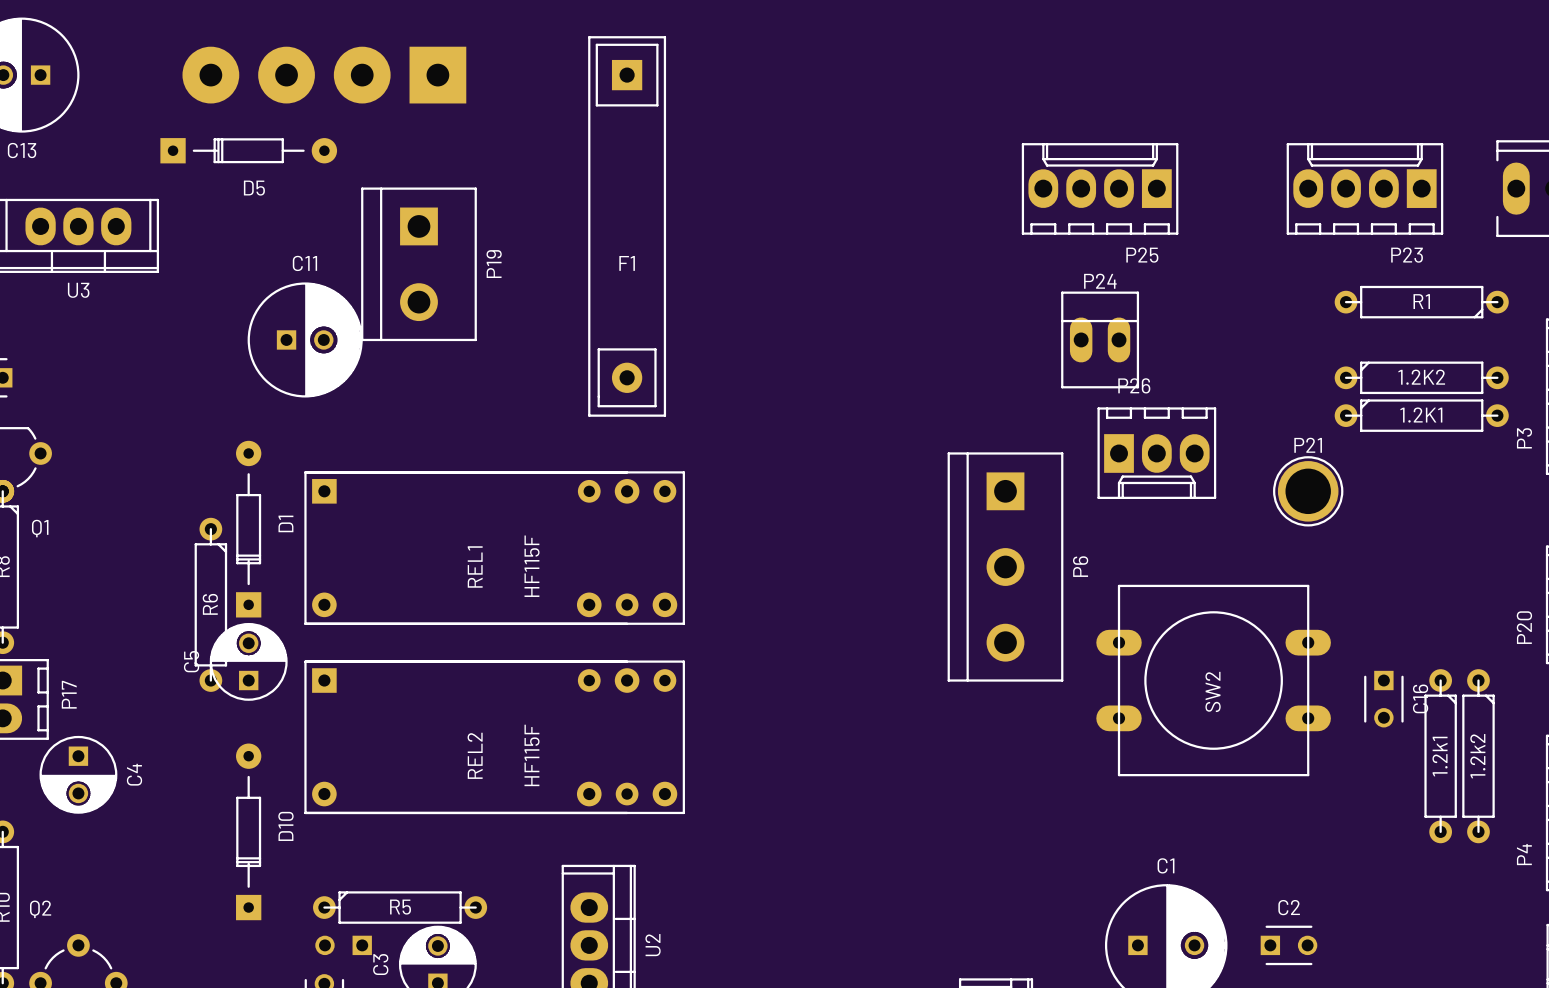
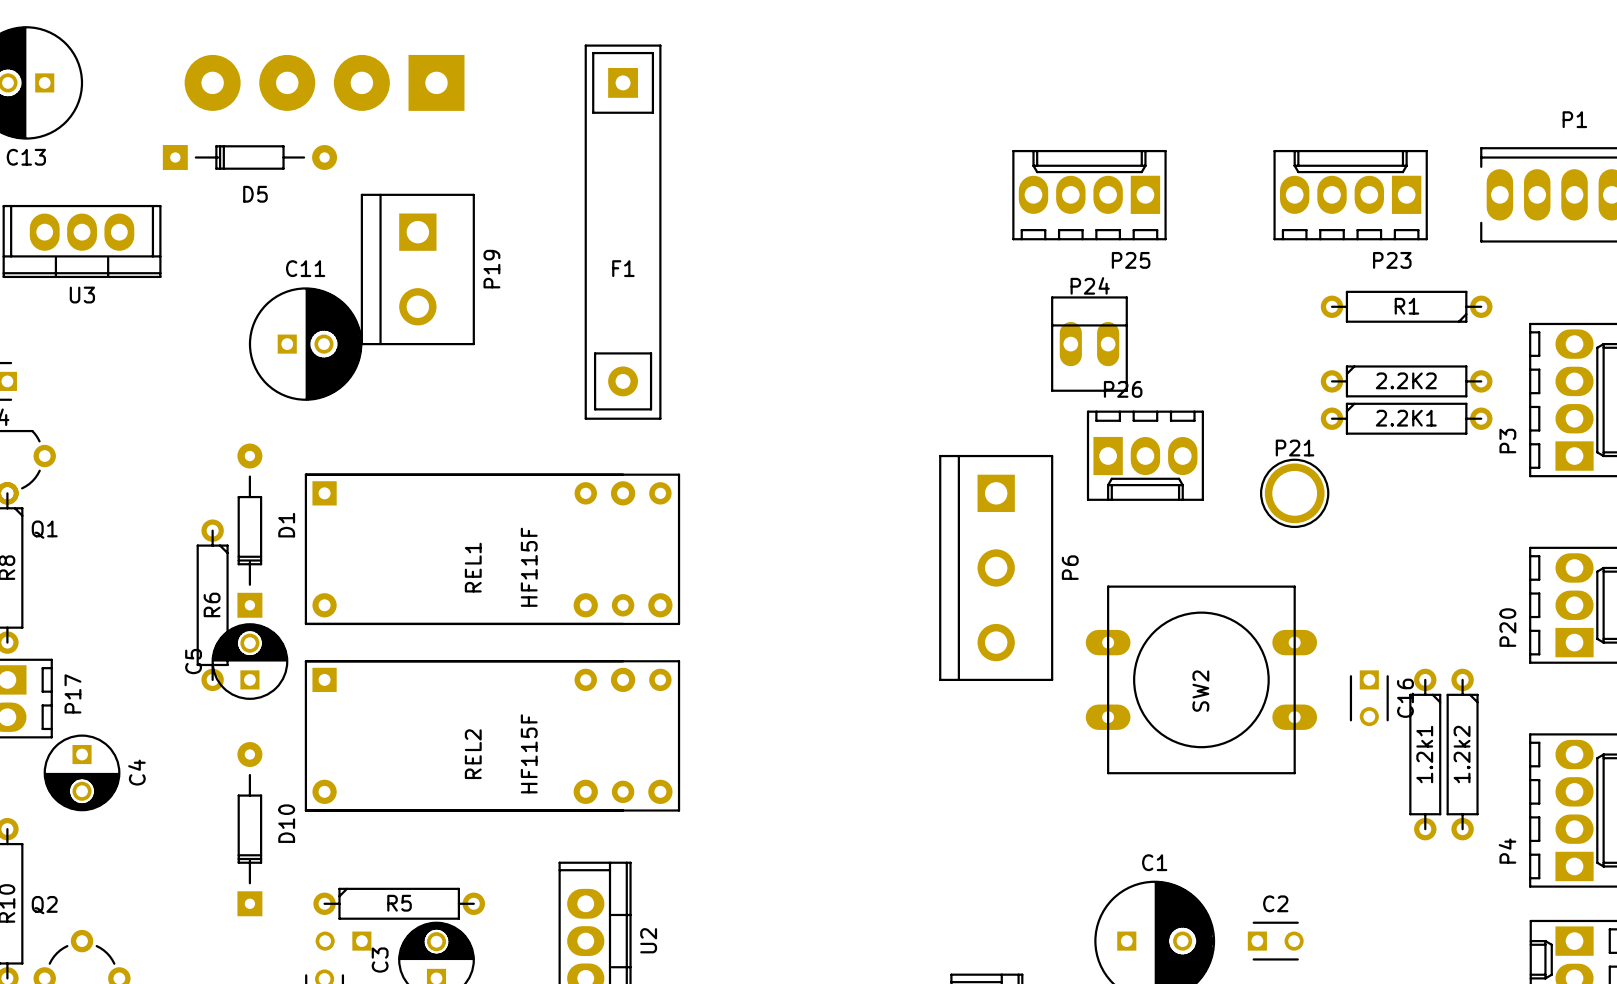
1.2K2 name: 1.2K2 (1421, 377) -> 2.2K2 (1406, 380)
1.2K1 name: 1.2K1 (1421, 415) -> 2.2K1 (1406, 418)

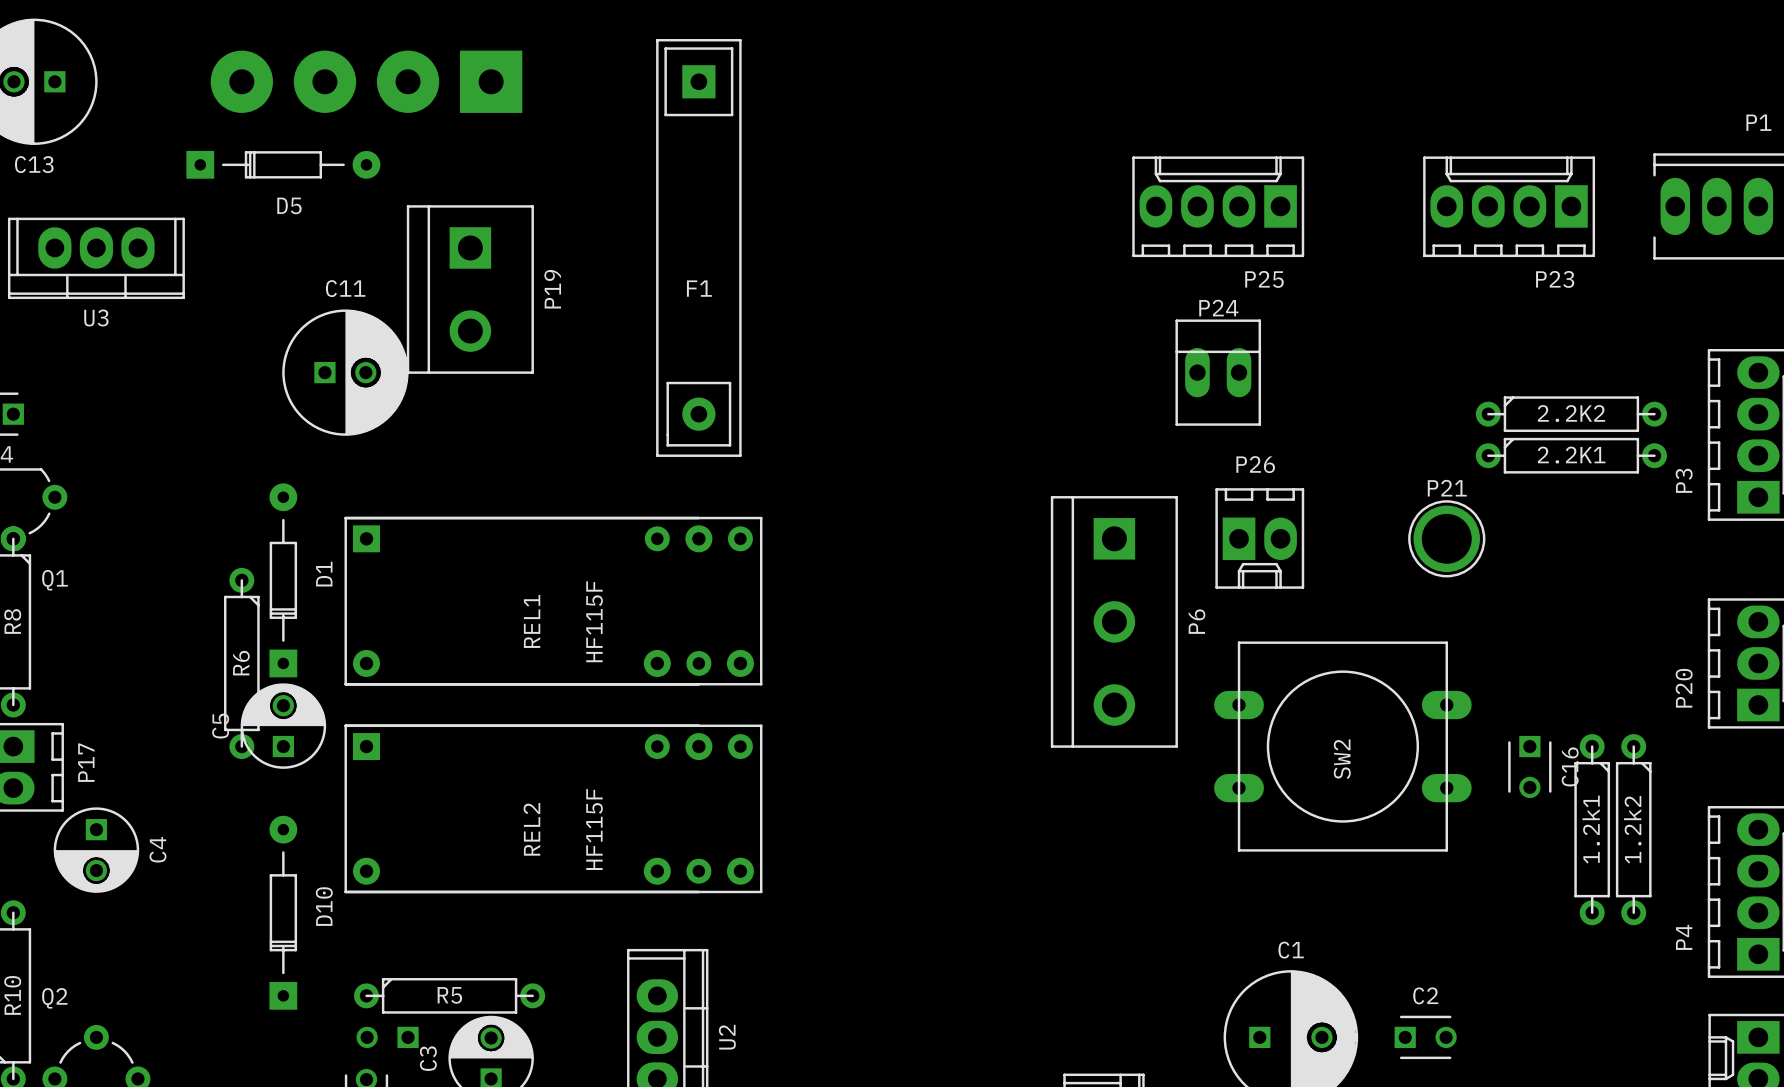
R1: (1406, 306) -> none
P26 footprint: [1086, 410, 1204, 501] -> [1215, 488, 1305, 589]

